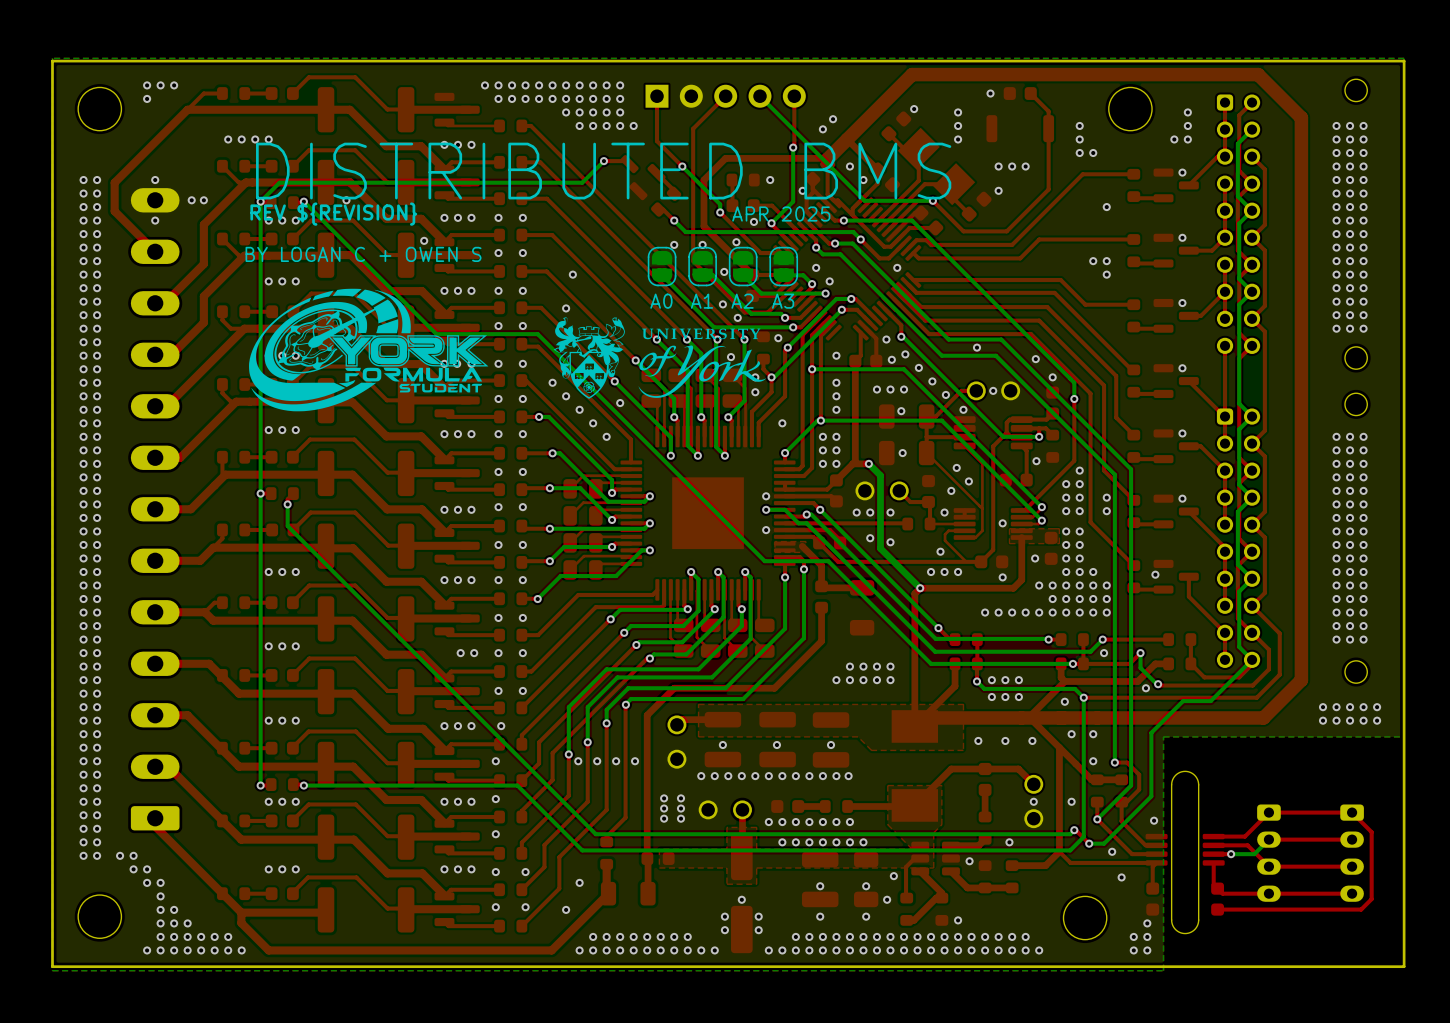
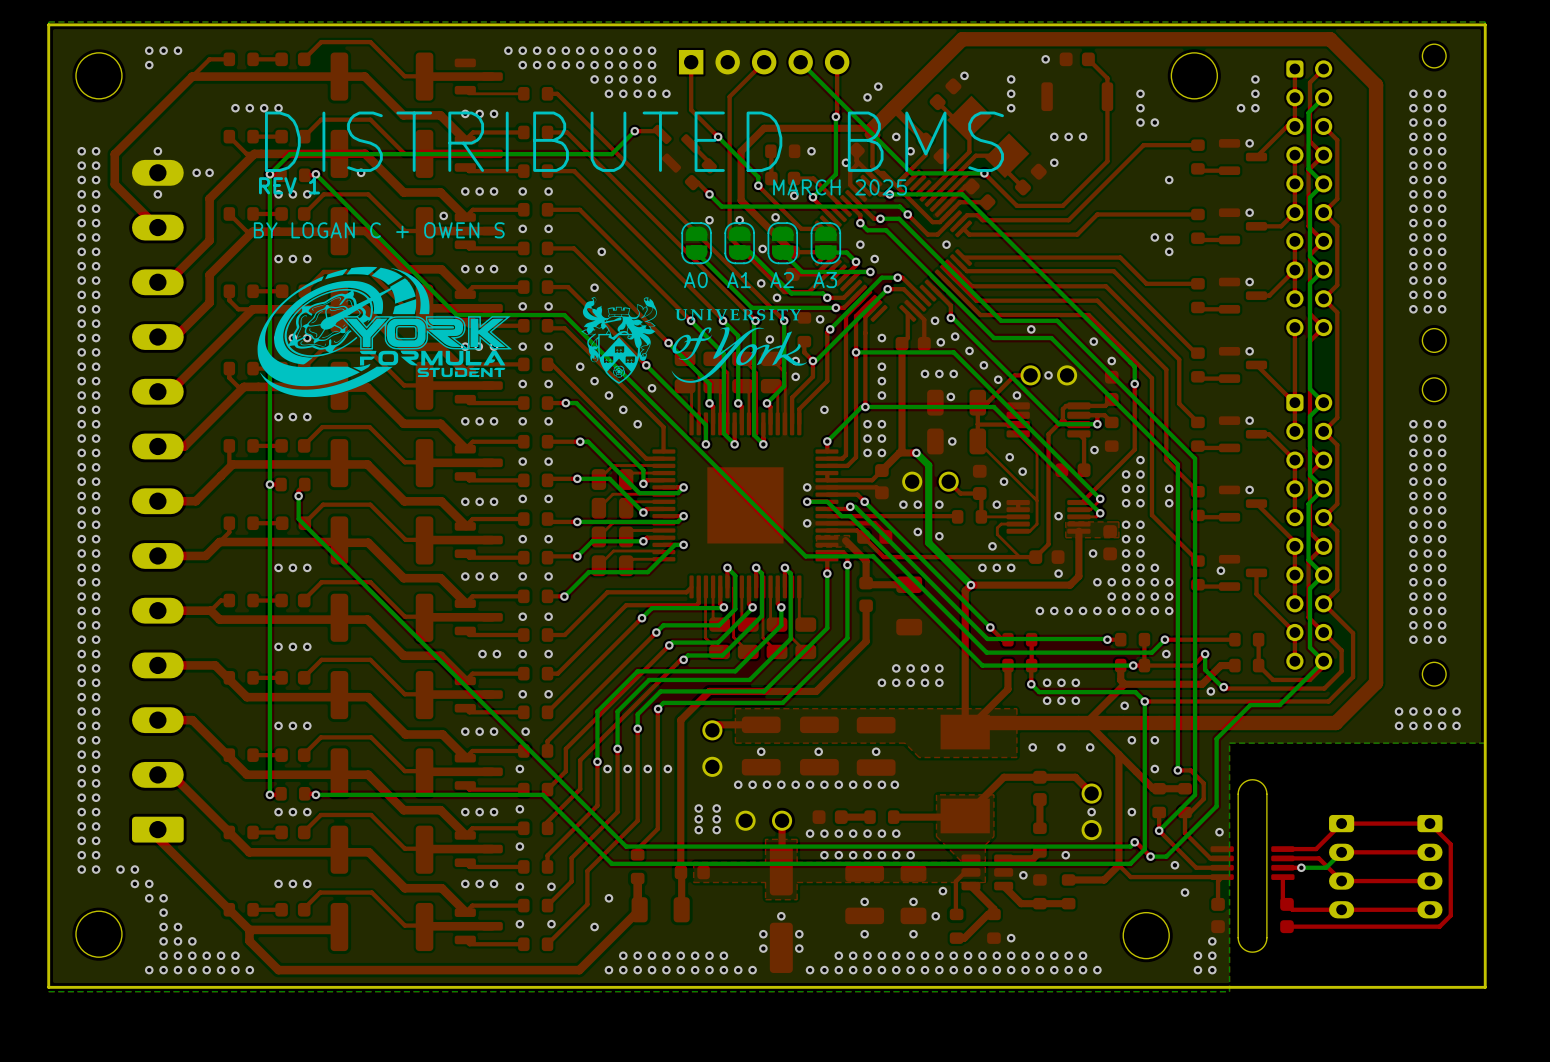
text: REV ${REVISION} (333, 214) -> REV 1 (289, 185)
text: APR 2025 (781, 214) -> MARCH 2025 (840, 187)

